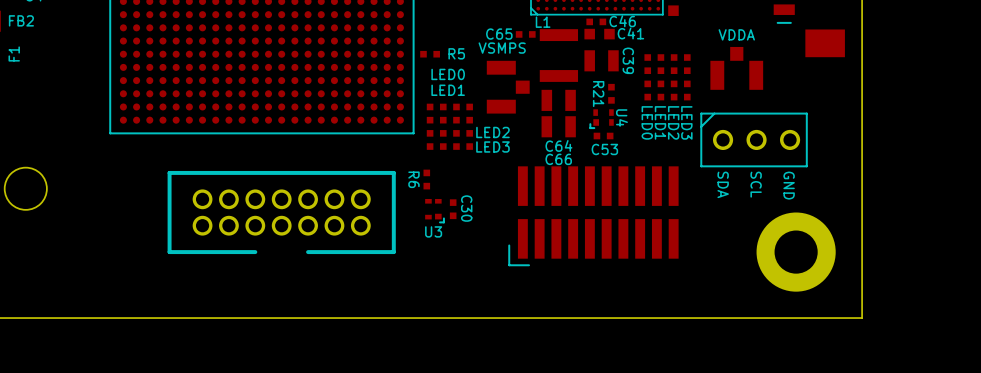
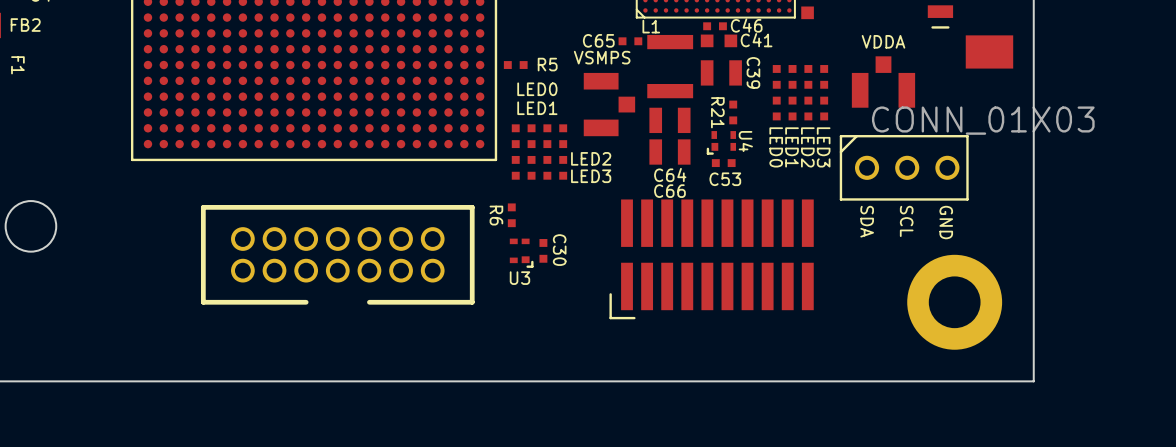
F1 name rotation: 0° (14, 53) -> 180° (17, 65)
part value: none -> CONN_01X03 (983, 120)

